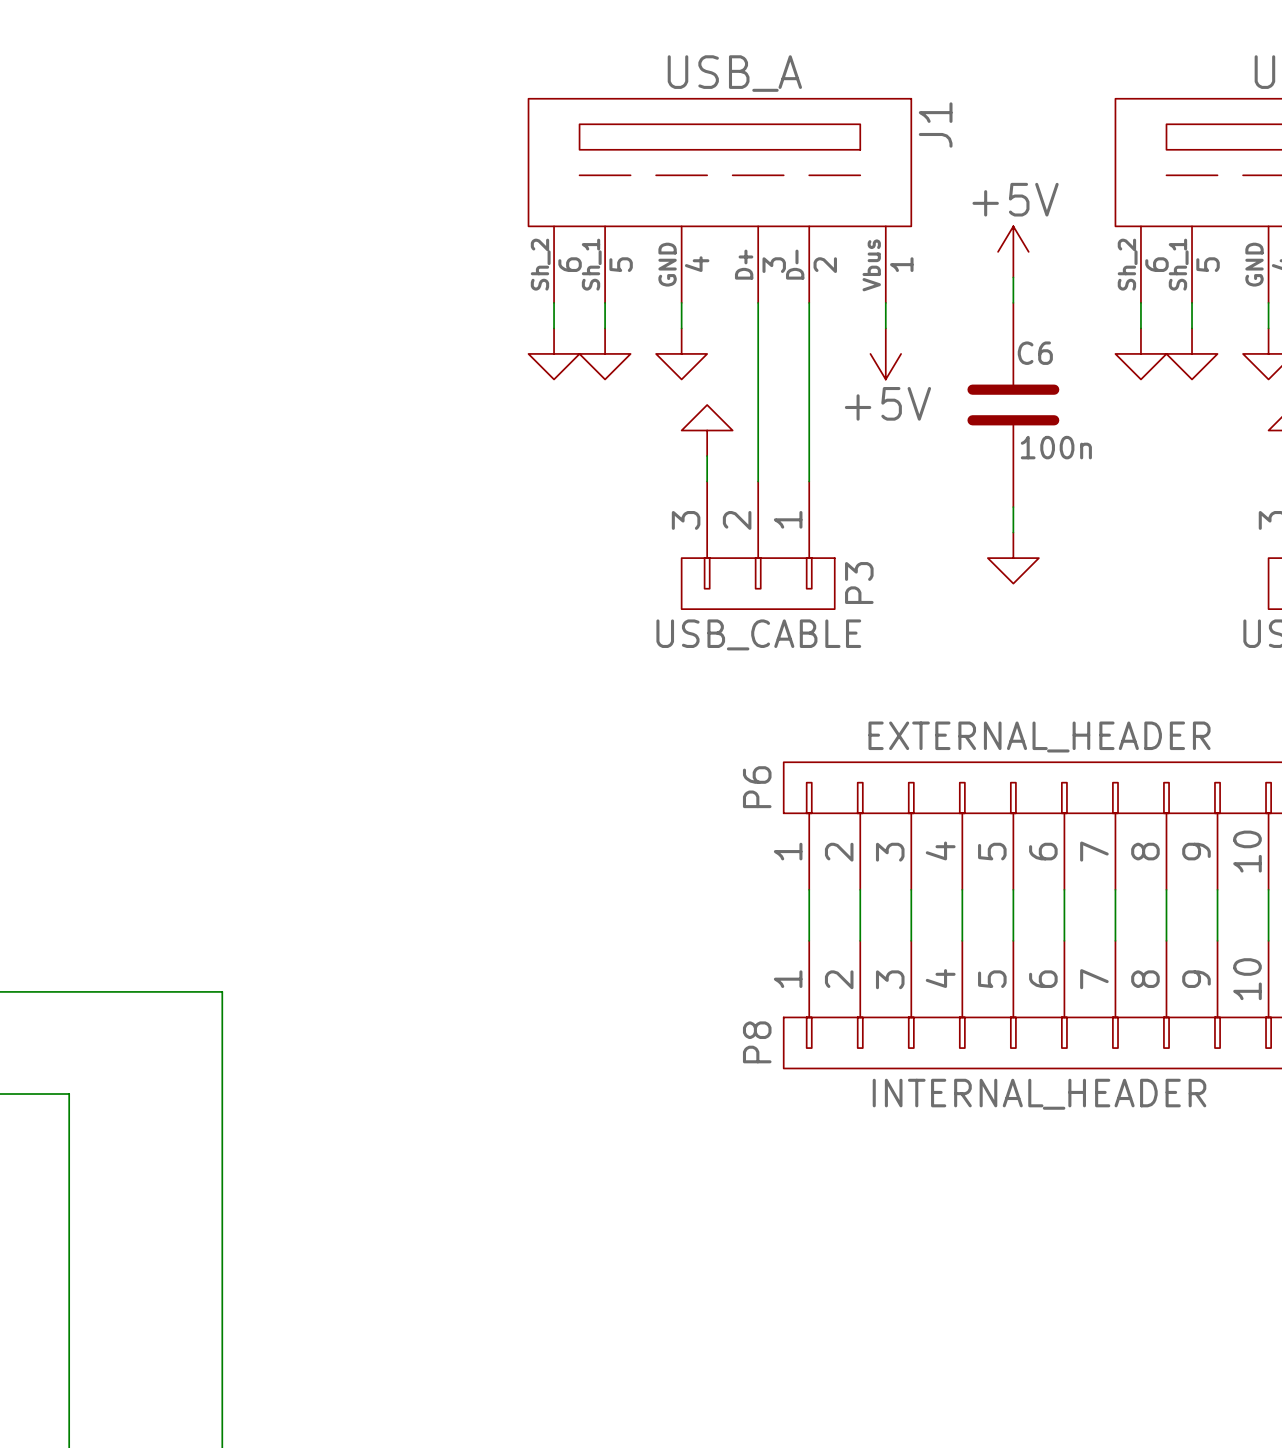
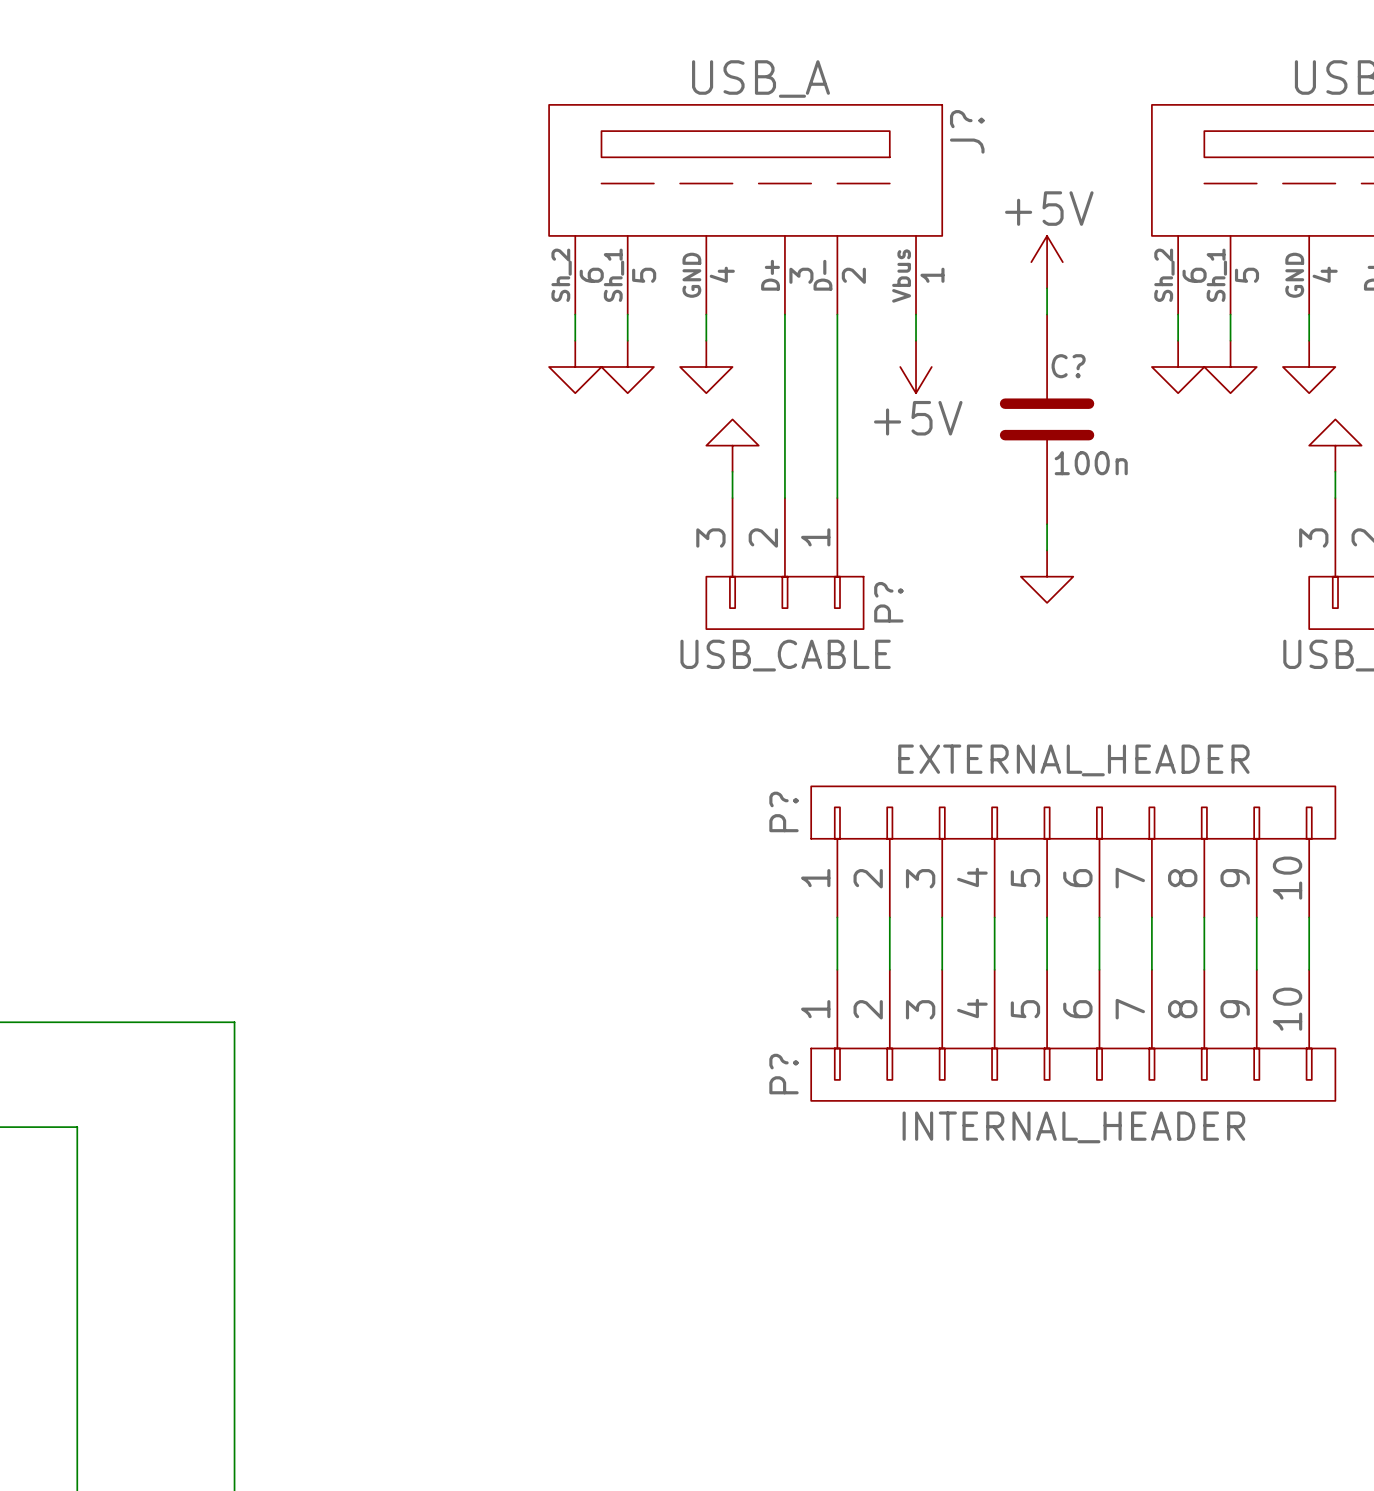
J1 name: J1 (935, 125) -> J? (967, 131)
C6 name: C6 (1035, 353) -> C? (1068, 366)
P3 name: P3 (859, 583) -> P? (888, 602)
P6 name: P6 (757, 787) -> P? (783, 811)
P8 name: P8 (757, 1042) -> P? (783, 1074)

